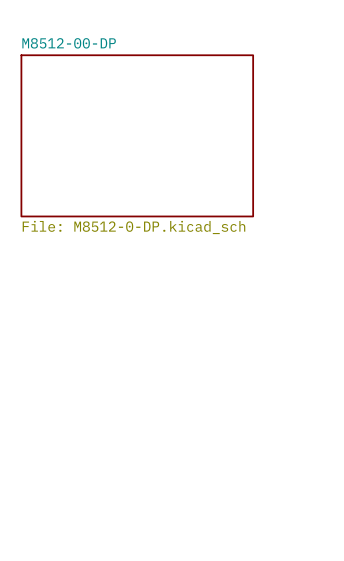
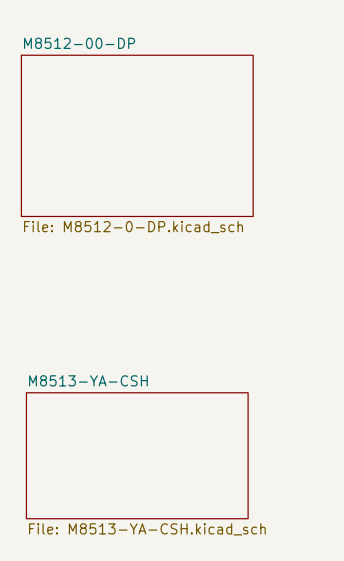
sheet M8513-YA-CSH: none -> File: M8513-YA-CSH.kicad_sch (137, 455)

